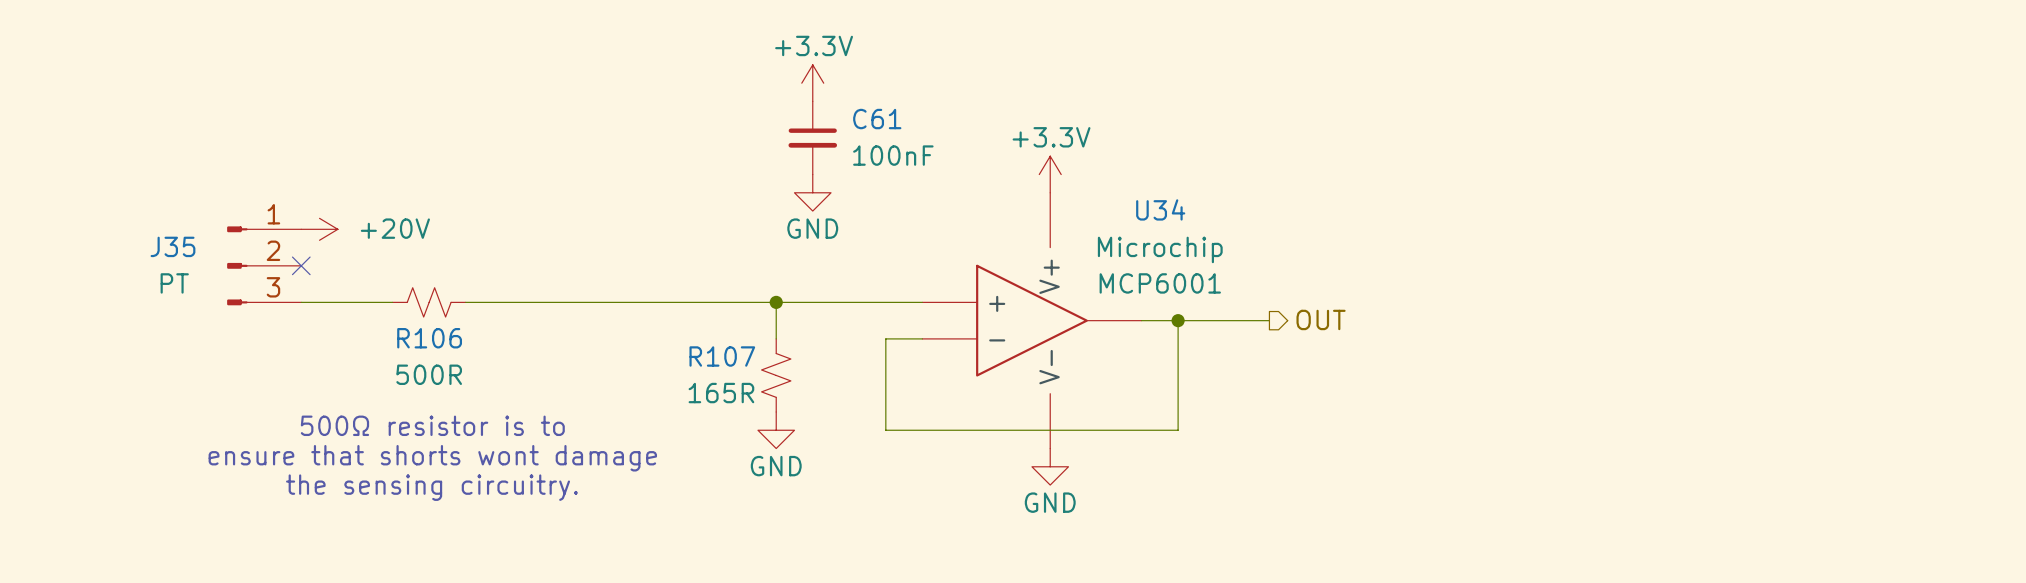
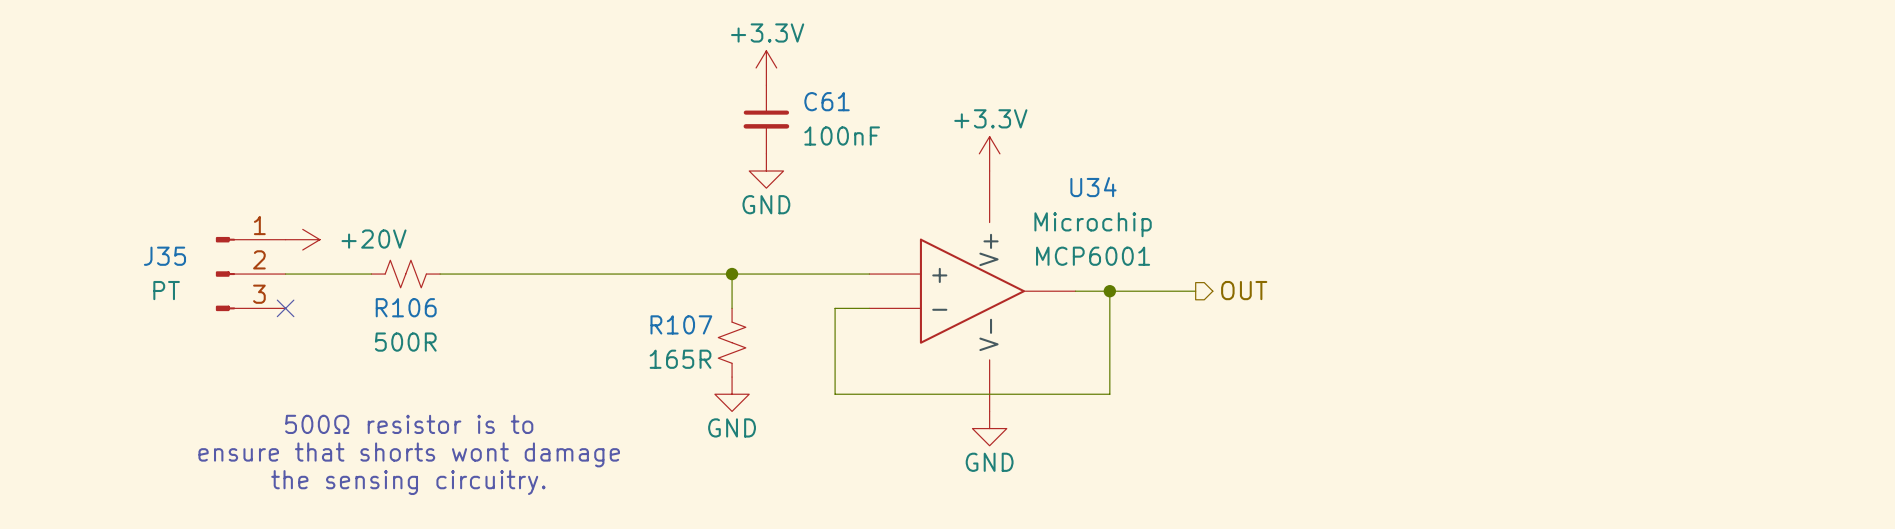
power symbol position: +20V (319, 229) -> +20V (302, 239)
J35 position: (264, 265) -> (250, 274)
no-connect mark position: (301, 265) -> (285, 308)
text: 500Ω resistor is to (432, 425) -> none
text: ensure that shorts wont damage (432, 458) -> 500Ω resistor is to (409, 424)
text: the sensing circuitry. (431, 487) -> ensure that shorts wont damage (409, 454)
text: none -> the sensing circuitry. (408, 482)

